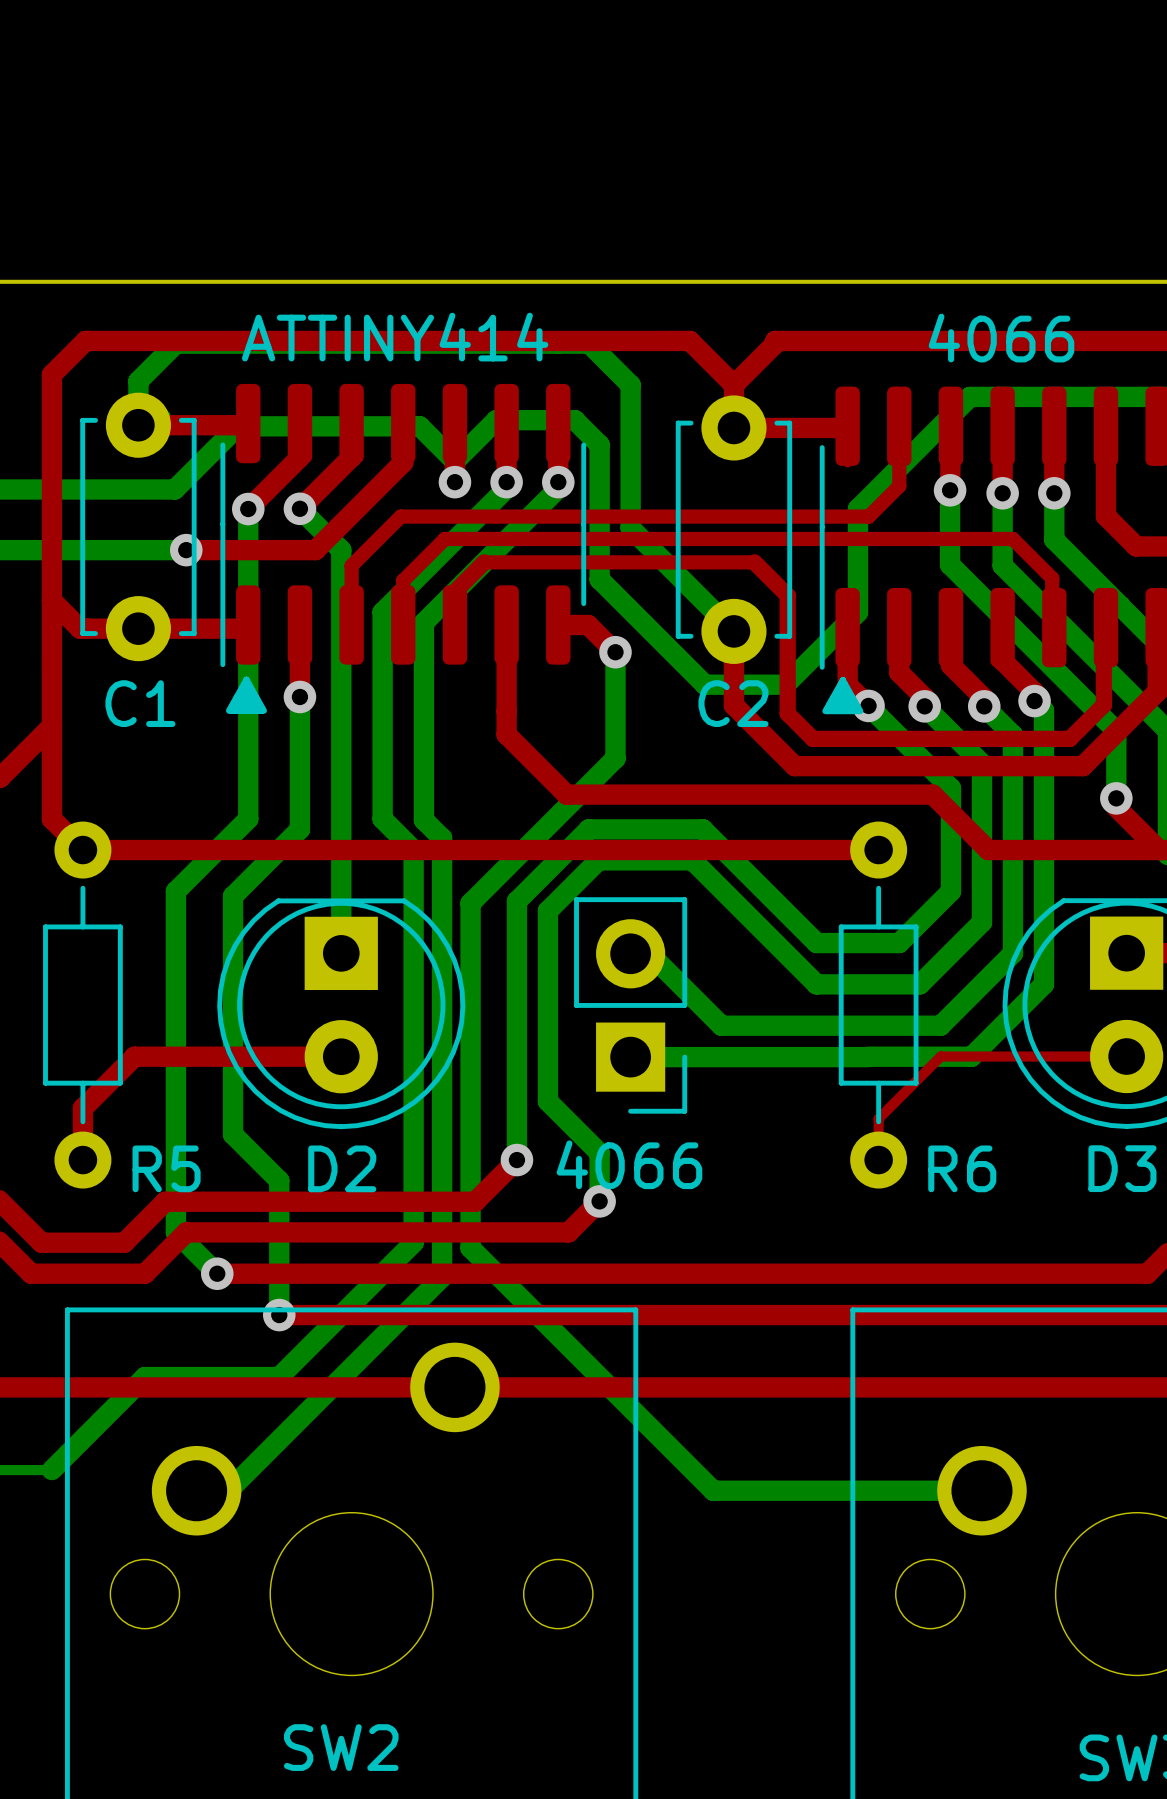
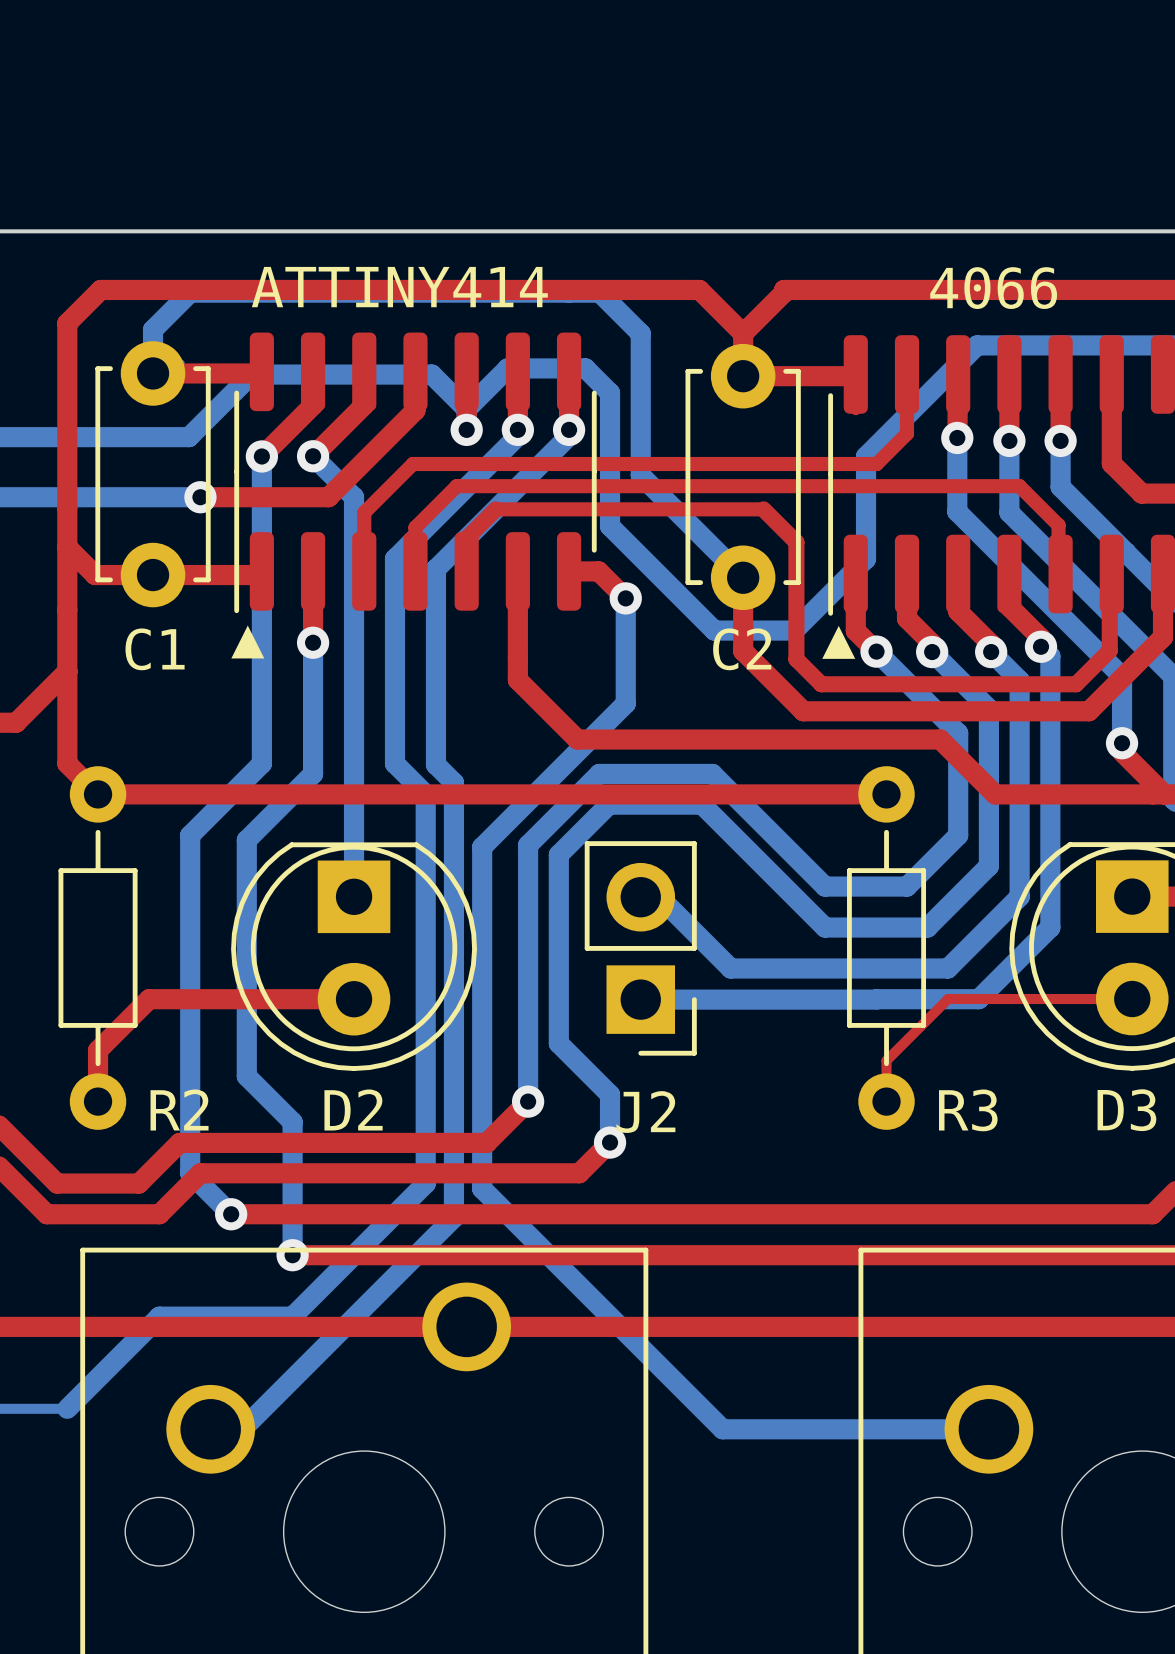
text: 4066 (629, 1164) -> none
R5 name: R5 (166, 1168) -> R2 (179, 1109)
R6 name: R6 (962, 1168) -> R3 (968, 1110)
J2 name: none -> J2 (645, 1112)

